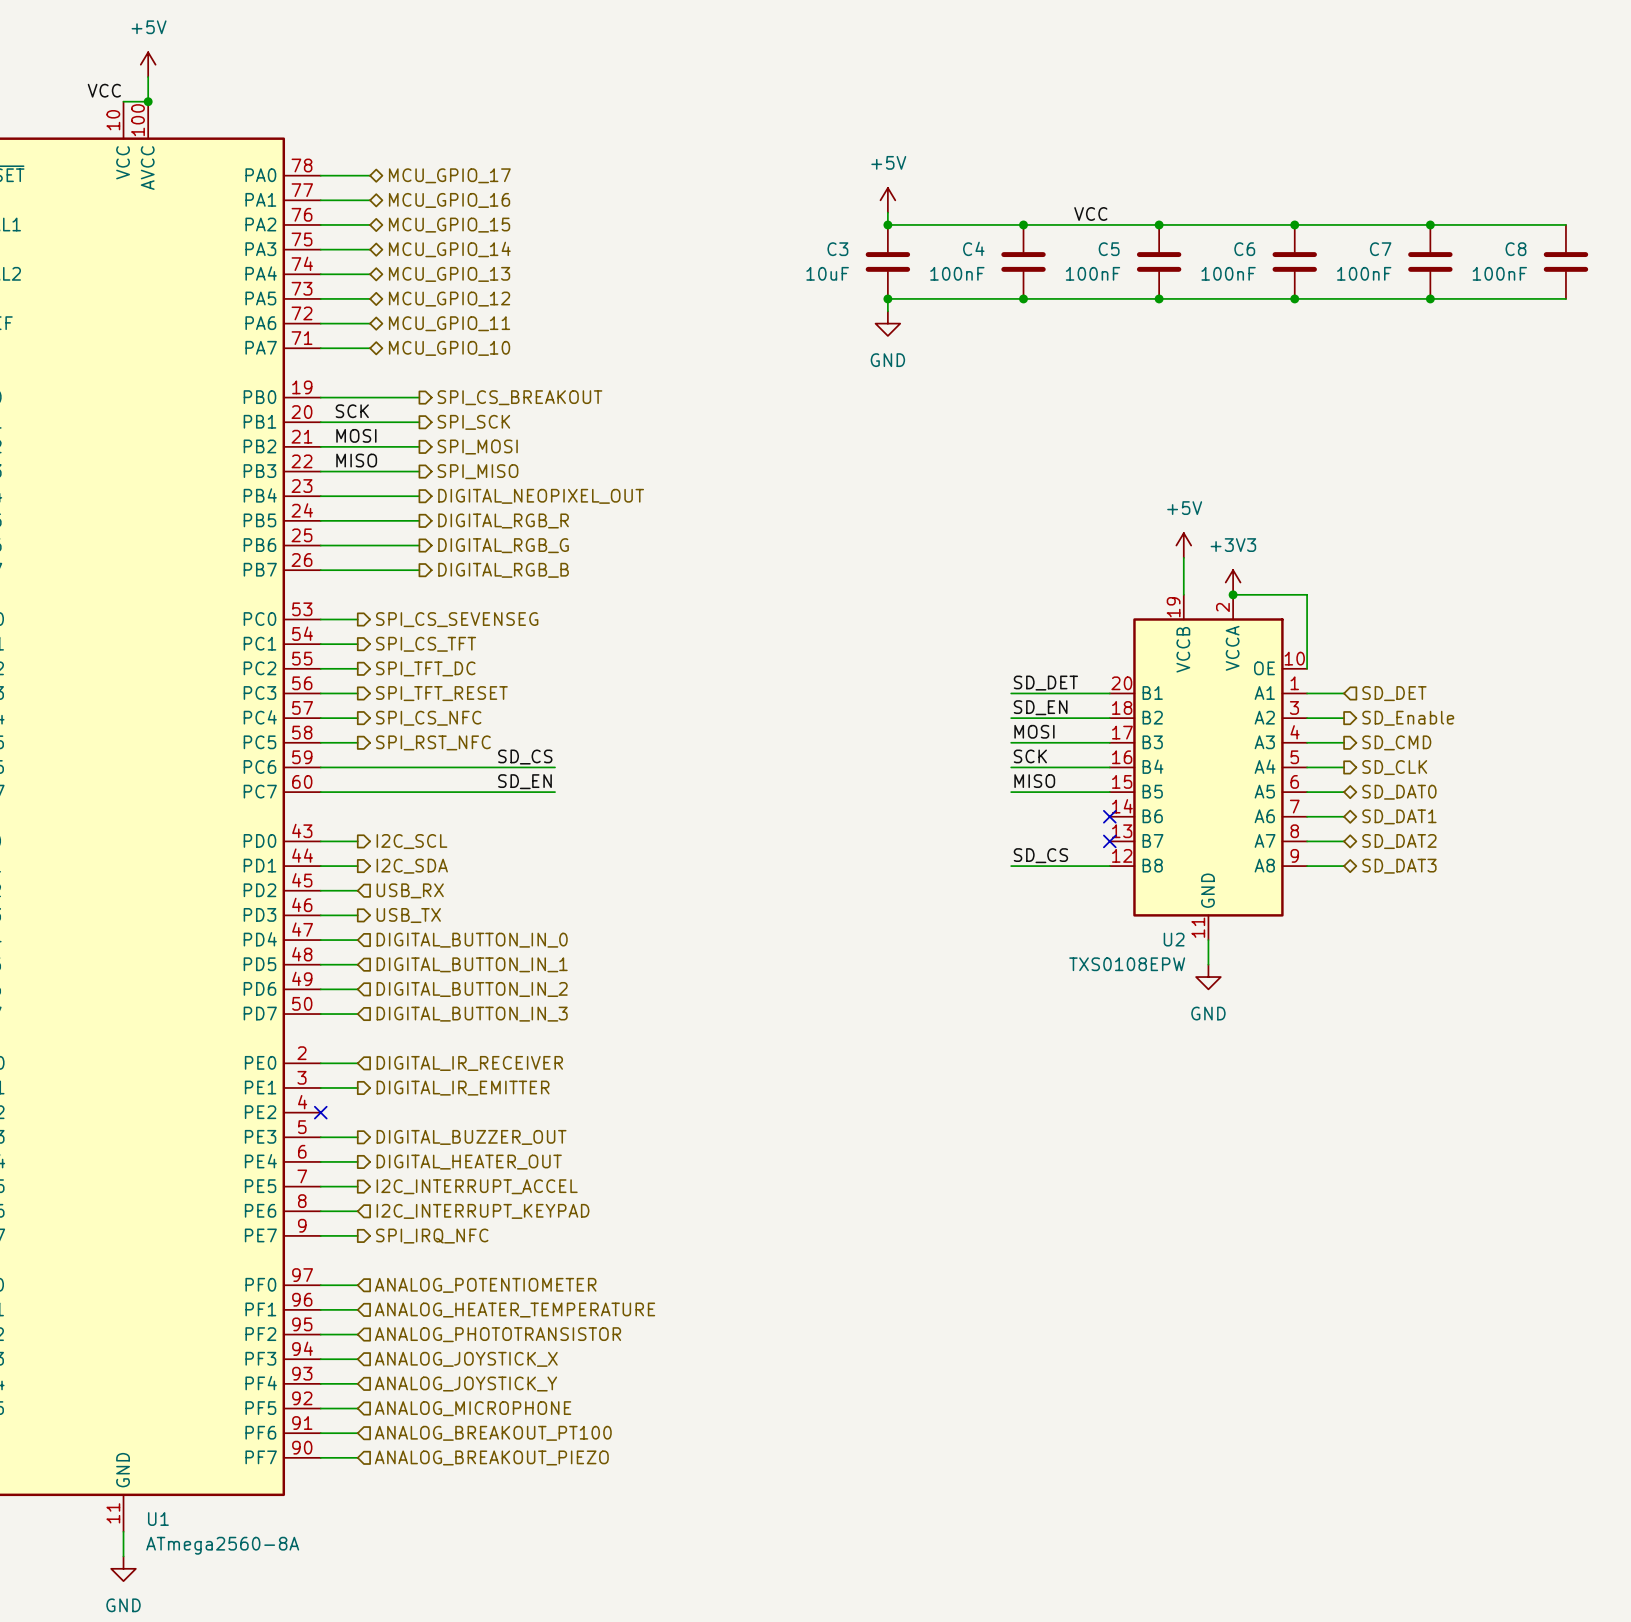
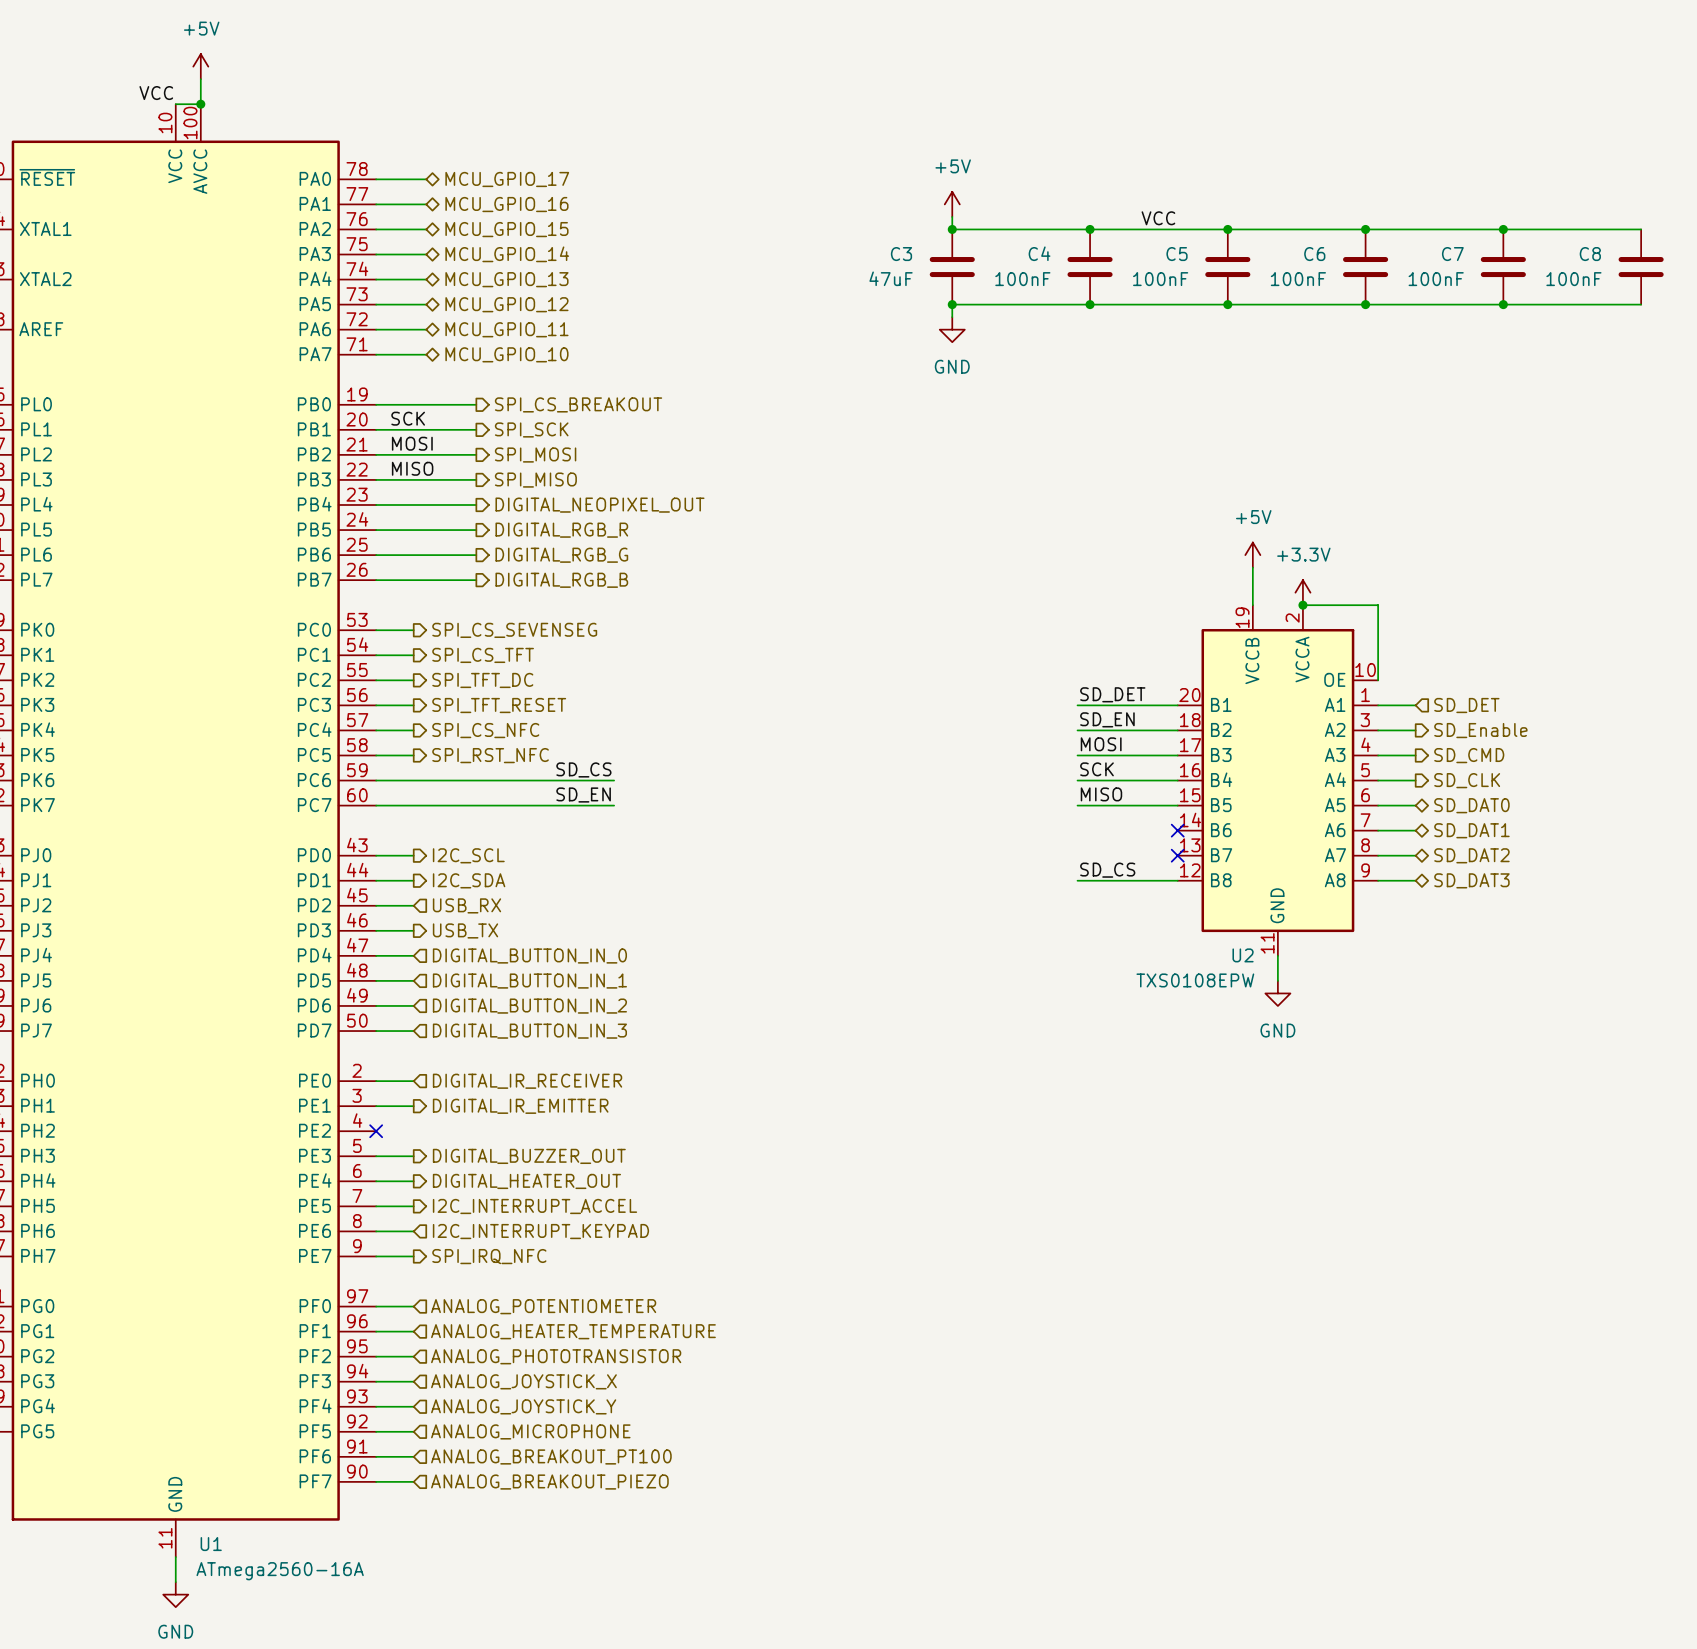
C3 value: 10uF (827, 273) -> 47uF (891, 278)
power symbol: +3V3 (1233, 582) -> +3.3V (1302, 592)
U1 value: ATmega2560-8A (222, 1545) -> ATmega2560-16A (280, 1571)

